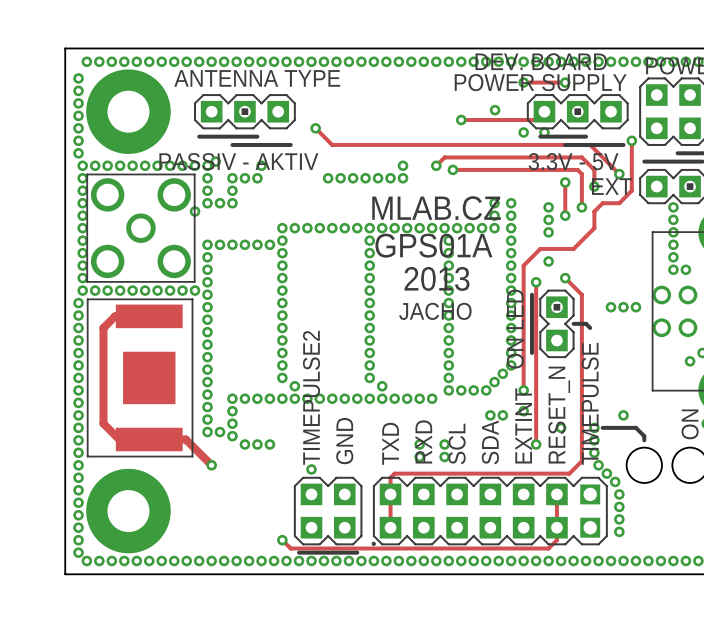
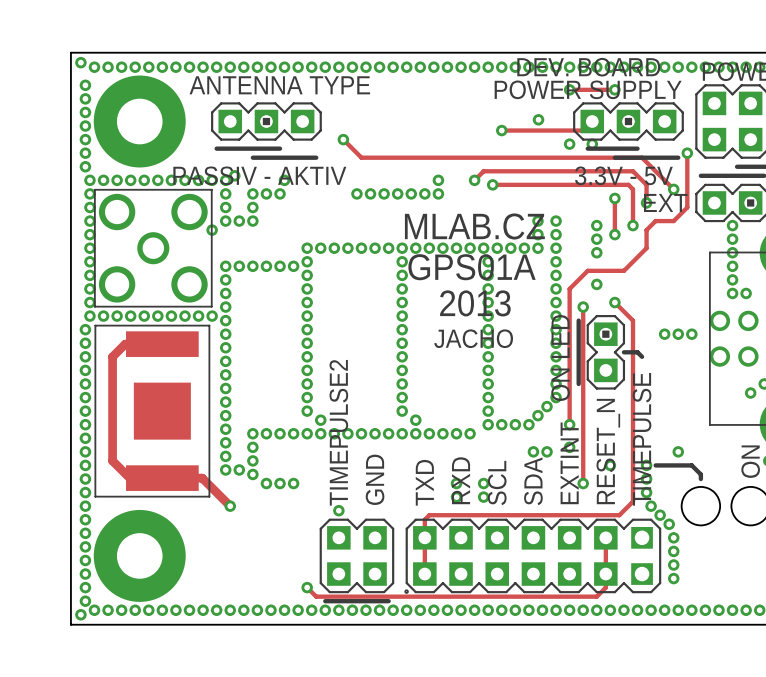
via: none -> (80, 62)
via: none -> (80, 614)

